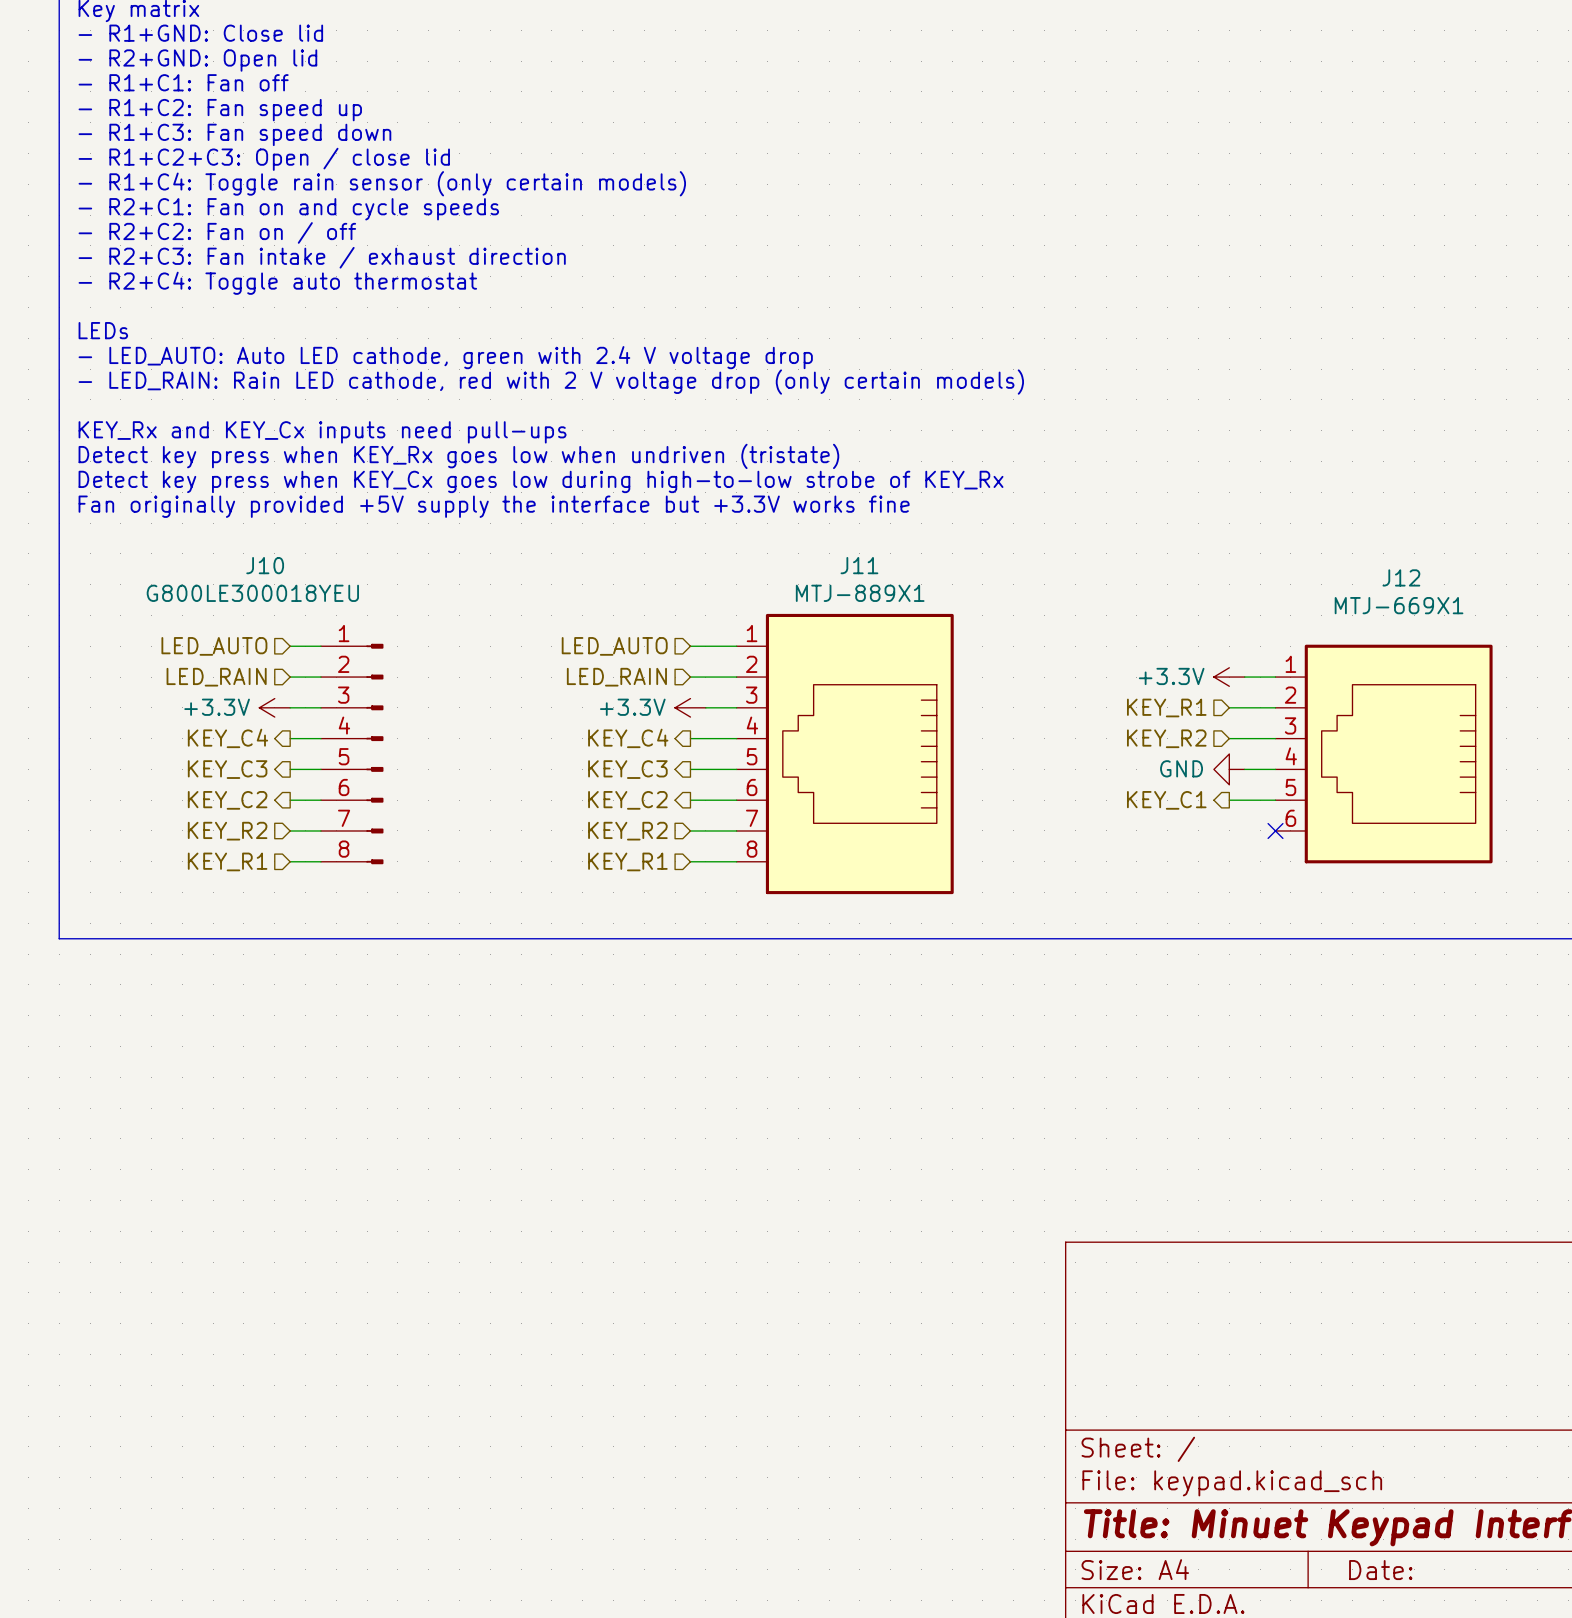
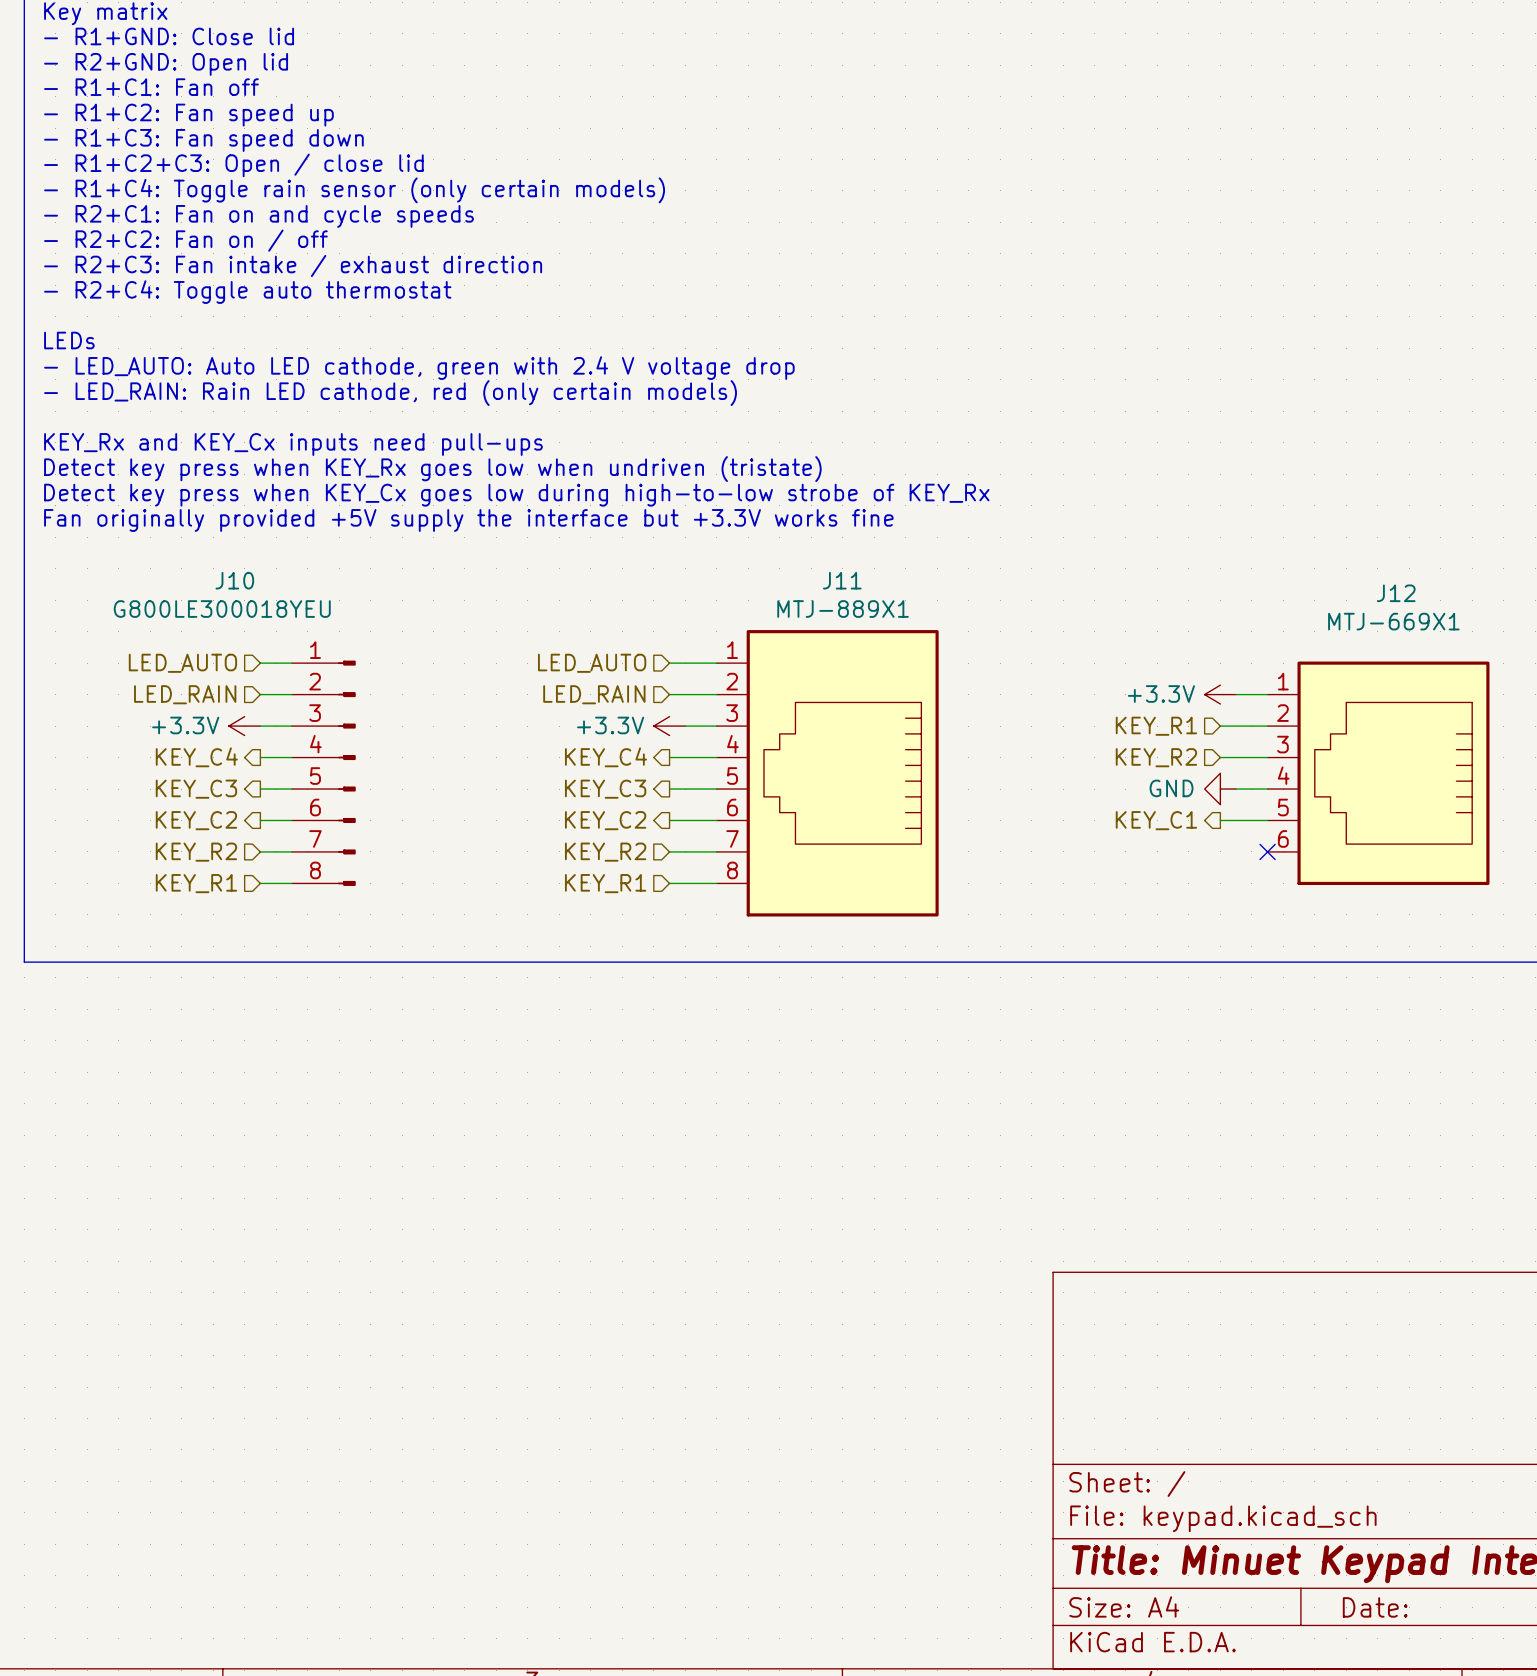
text: - LED_RAIN: Rain LED cathode, red with 2 V voltage drop (only certain models) (551, 382) -> - LED_RAIN: Rain LED cathode, red (only certain models) (390, 393)

